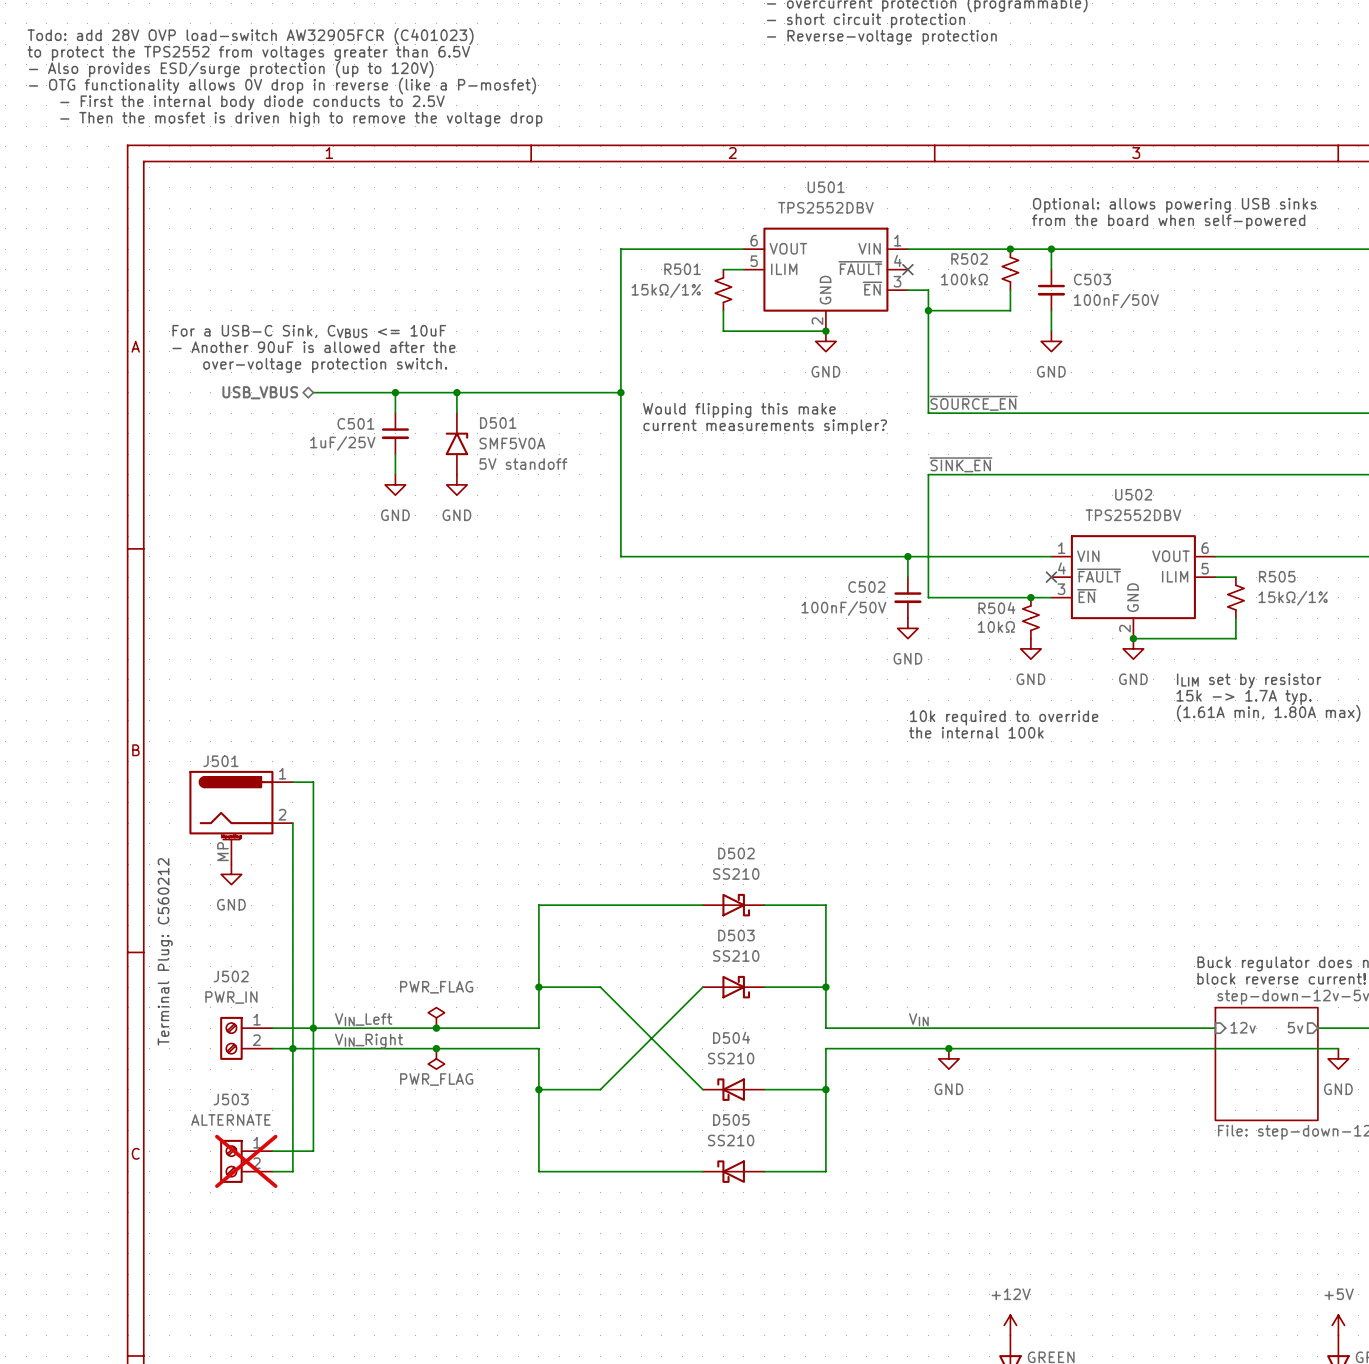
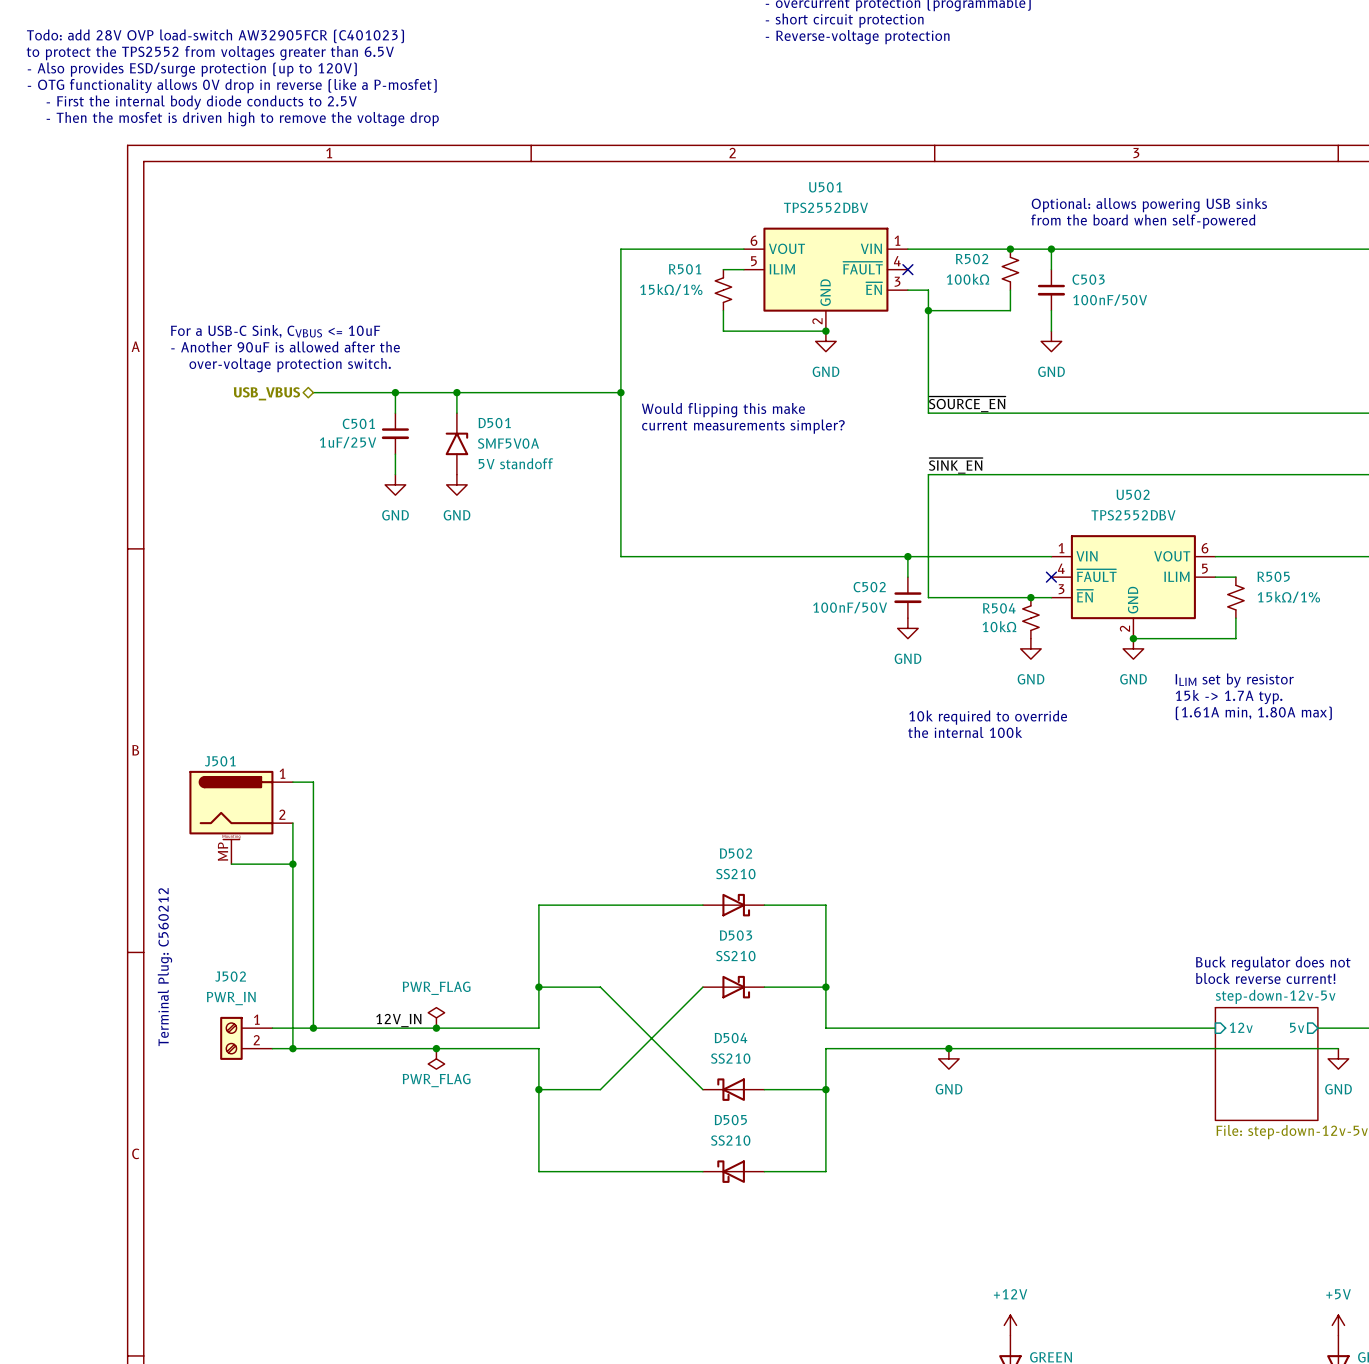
wire: none -> (231, 864) (292, 864)
junction: none -> (292, 864)
power symbol: GND (231, 874) -> none
label: VIN_Left (363, 1019) -> none
label: none -> 12V_IN (398, 1020)
label: VIN (918, 1019) -> none
wire: (313, 1028) (313, 1151) (272, 1151) -> none
label: VIN_Right (369, 1041) -> none
wire: (292, 1048) (292, 1171) (272, 1171) -> none
J503: ALTERNATE (246, 1161) -> none

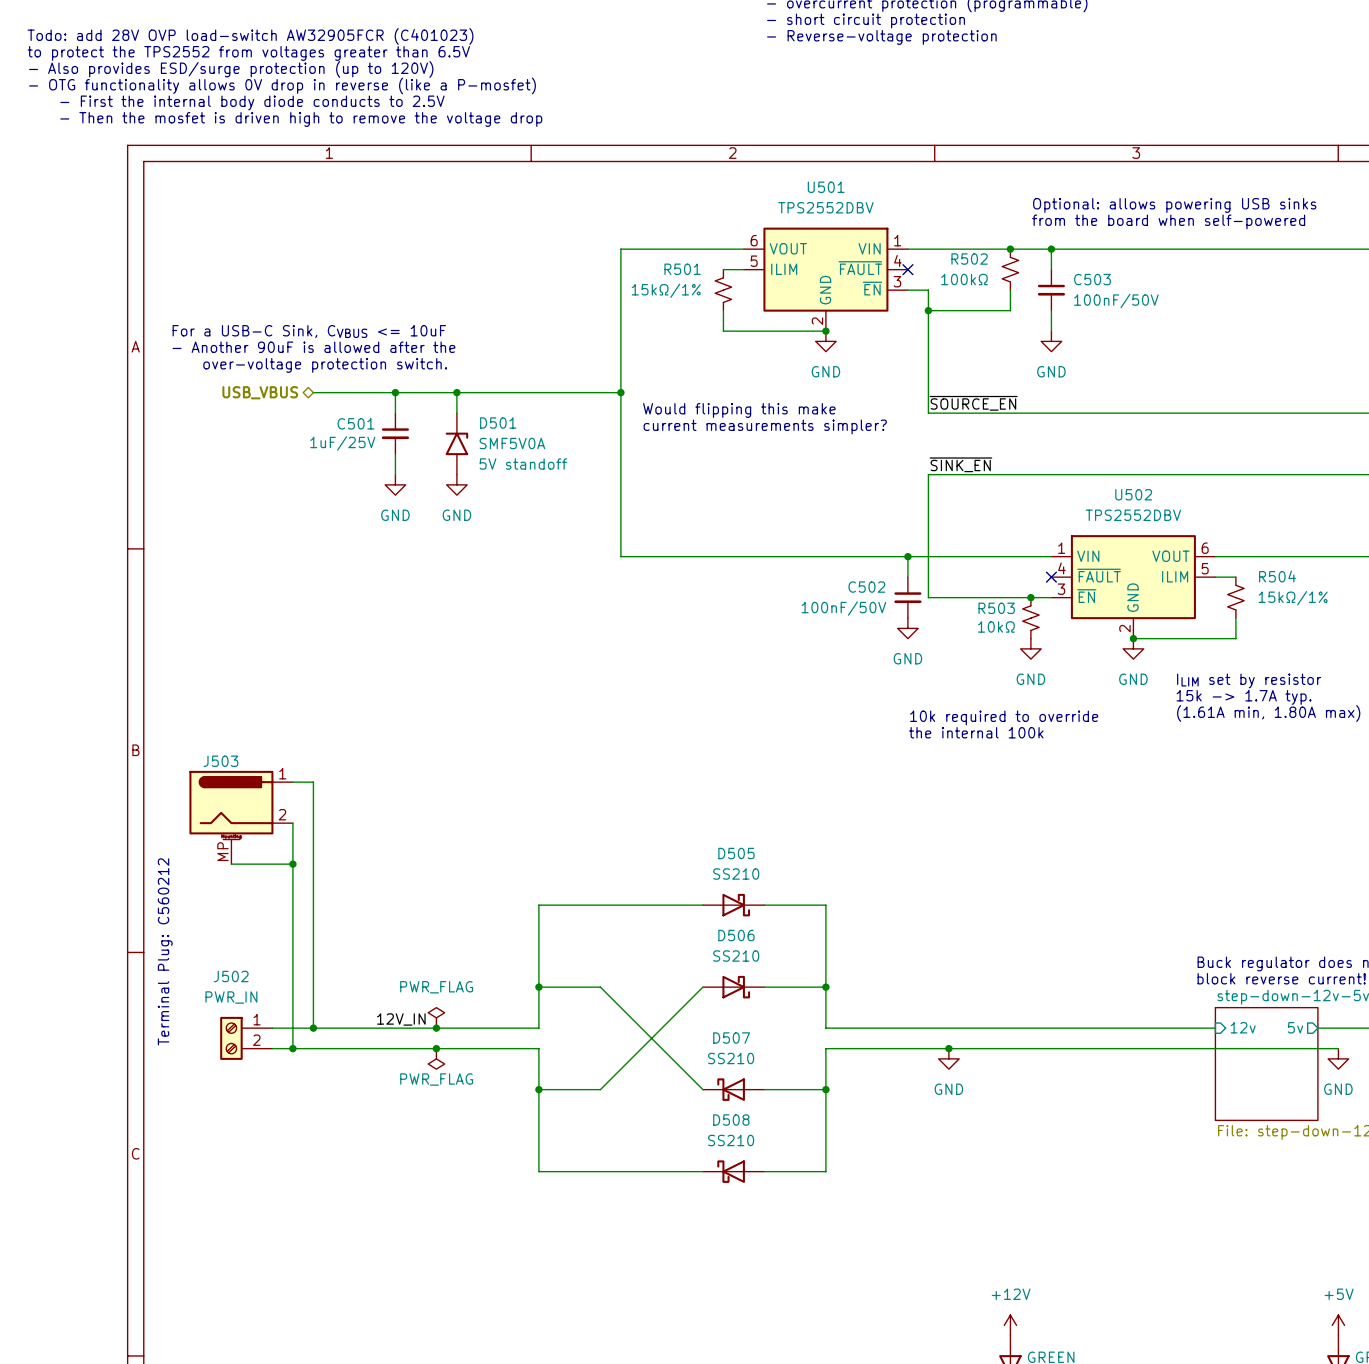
R505 name: R505 (1273, 576) -> R504 (1277, 576)
R504 name: R504 (999, 608) -> R503 (996, 608)
J501 name: J501 (220, 761) -> J503 (220, 761)
D502 name: D502 (735, 853) -> D505 (736, 853)
D503 name: D503 (735, 935) -> D506 (736, 935)
D504 name: D504 (731, 1038) -> D507 (731, 1038)
D505 name: D505 (730, 1120) -> D508 (731, 1120)

